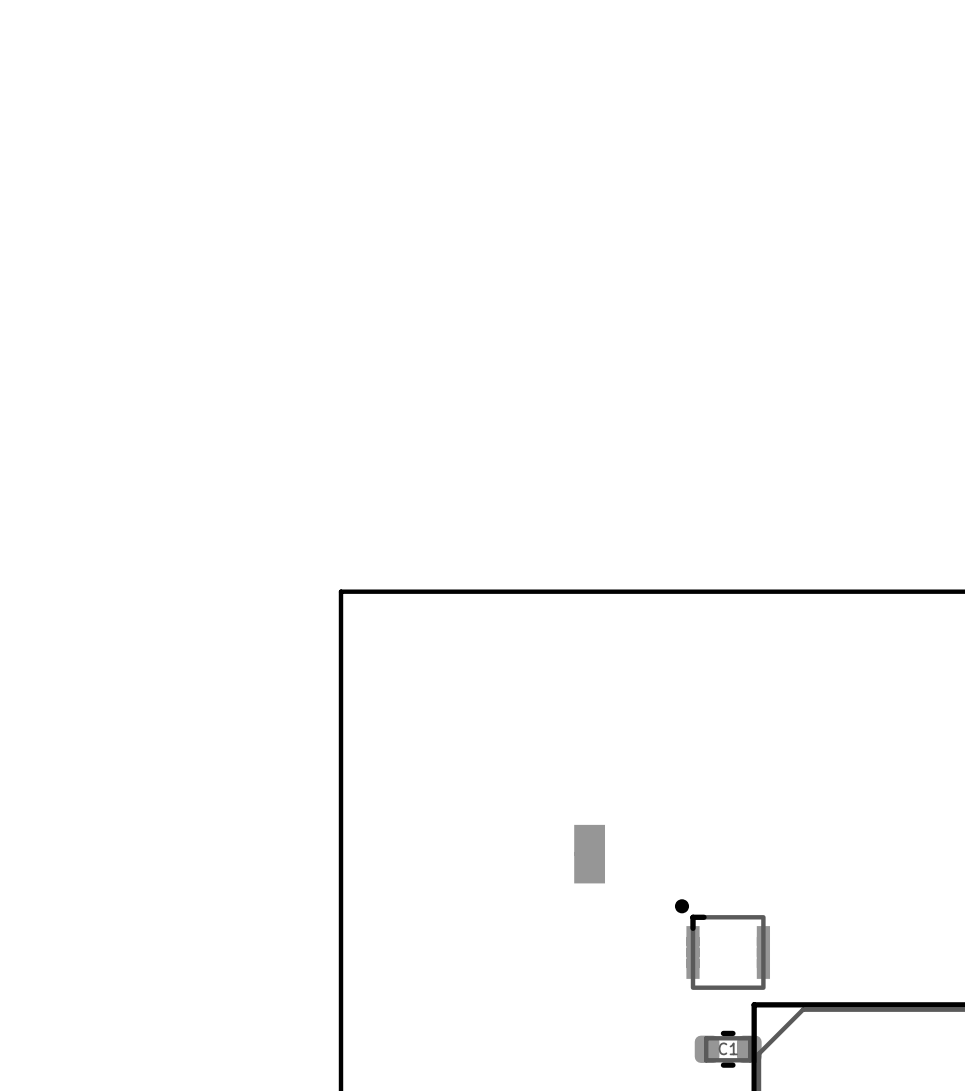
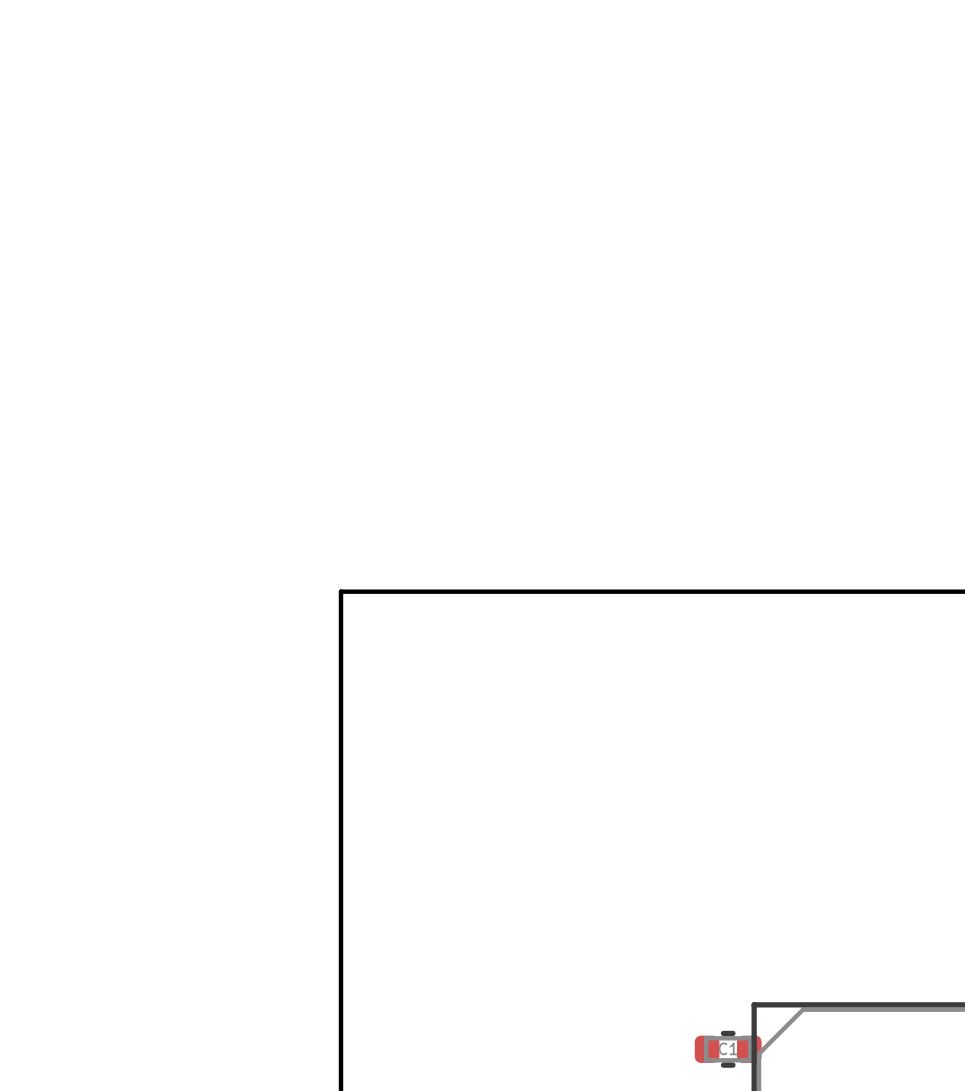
part: (589, 854) -> none
part: (722, 944) -> none

